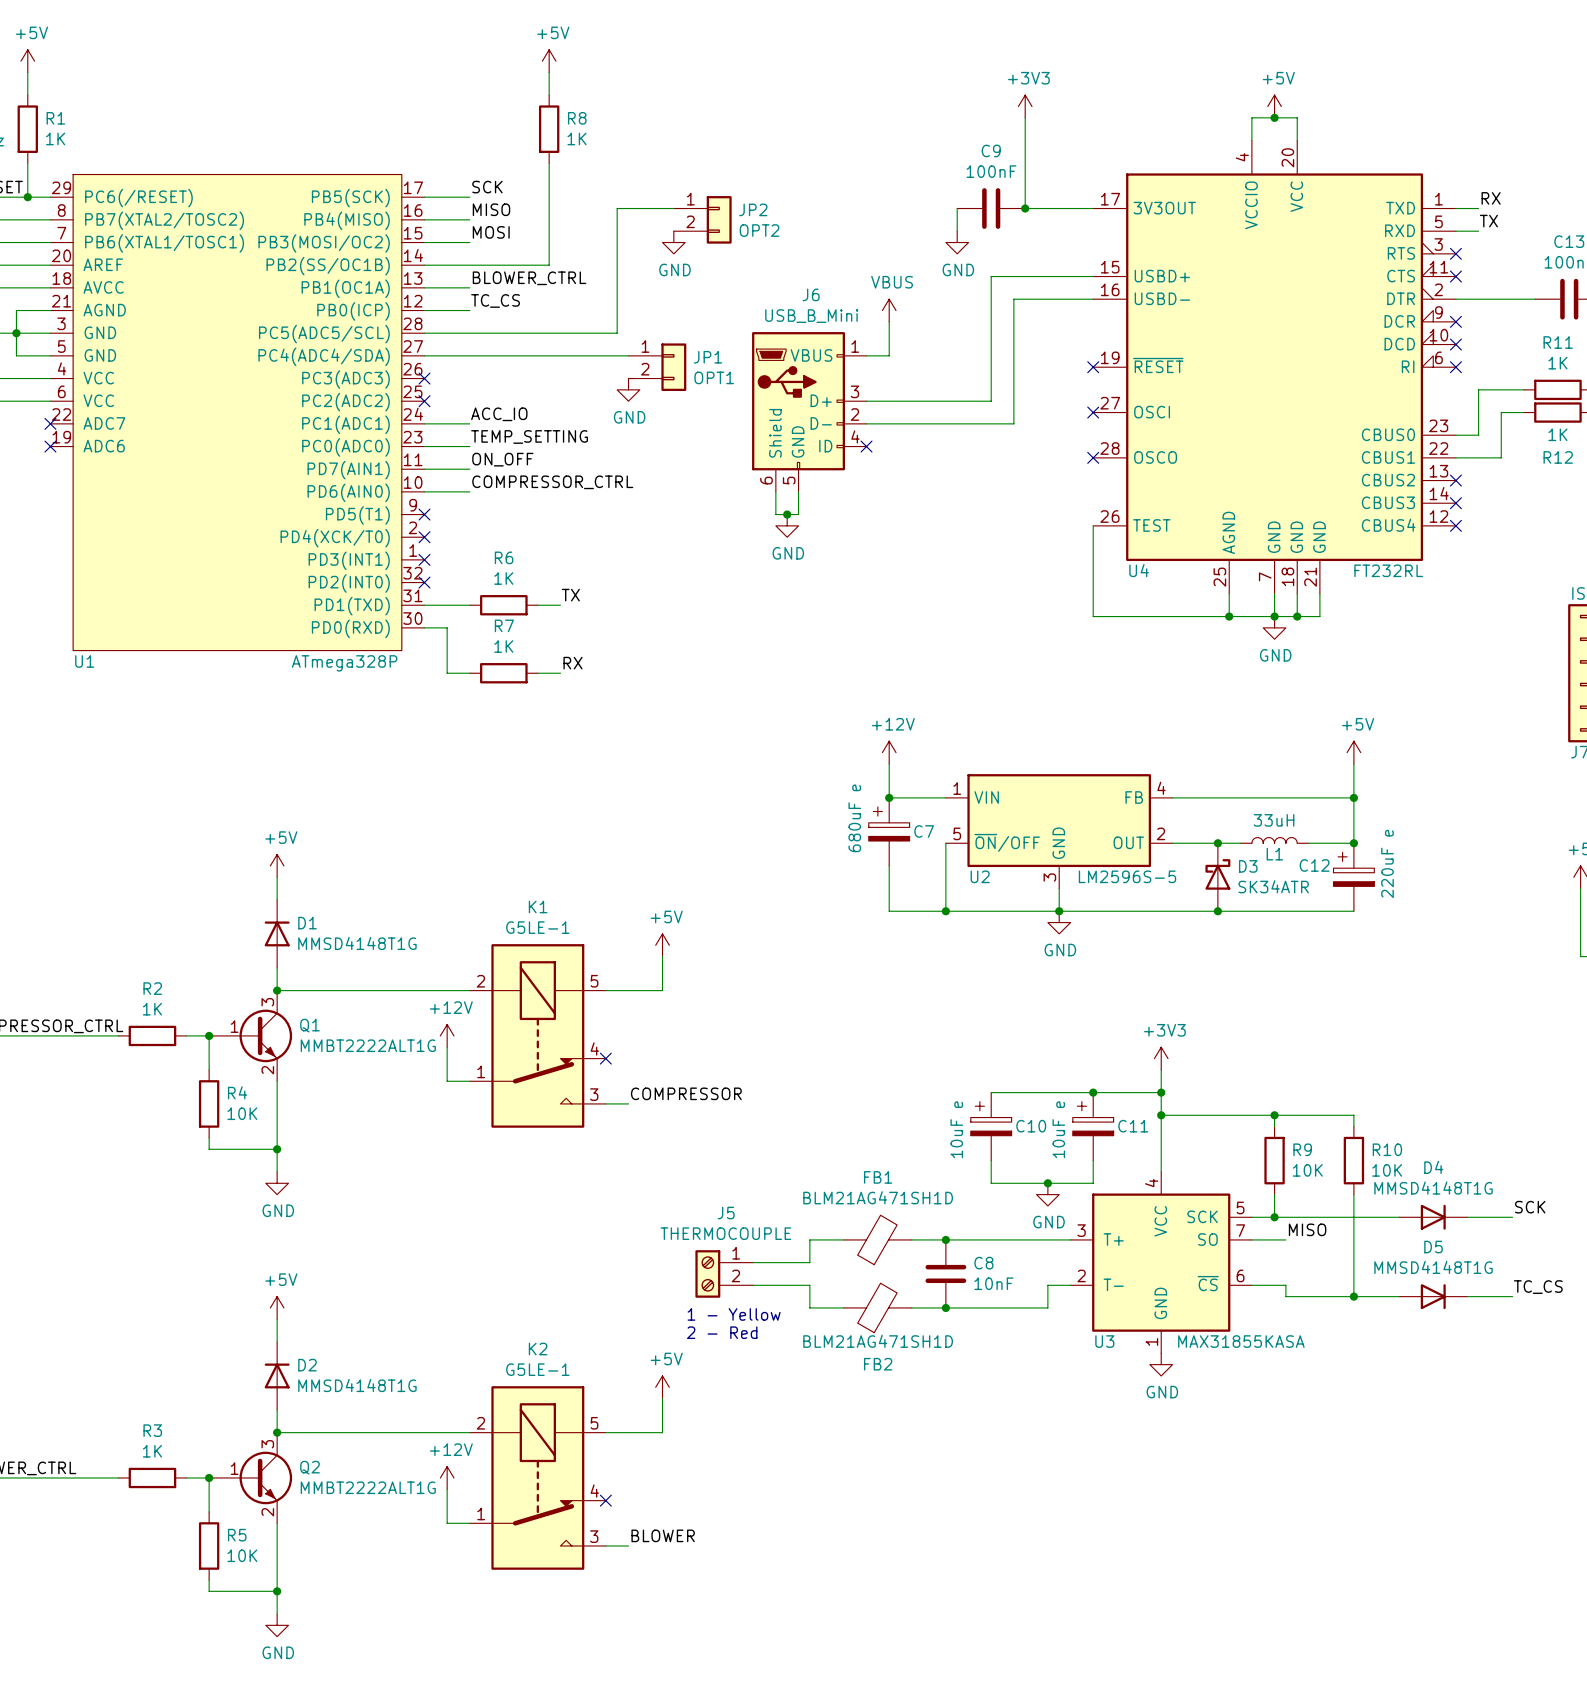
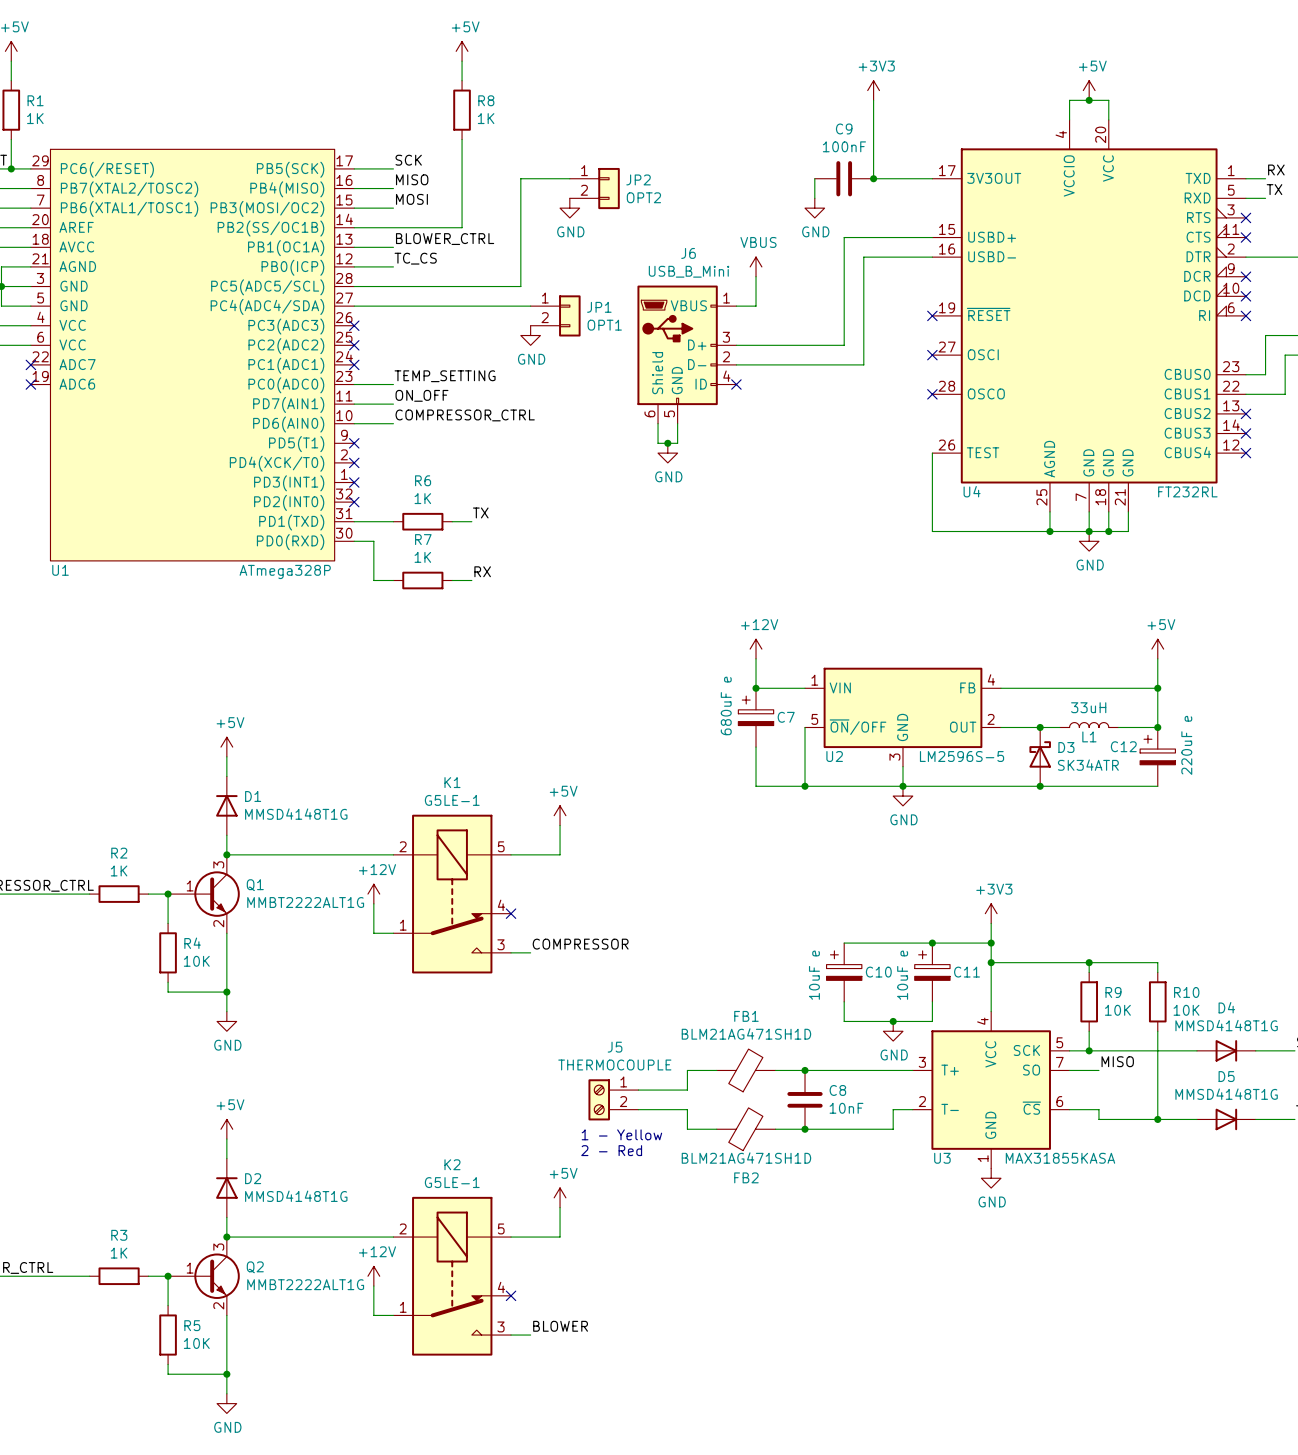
label: ACC_IO (499, 414) -> none
wire: (424, 423) (469, 423) -> none
no-connect mark: none -> (354, 364)

